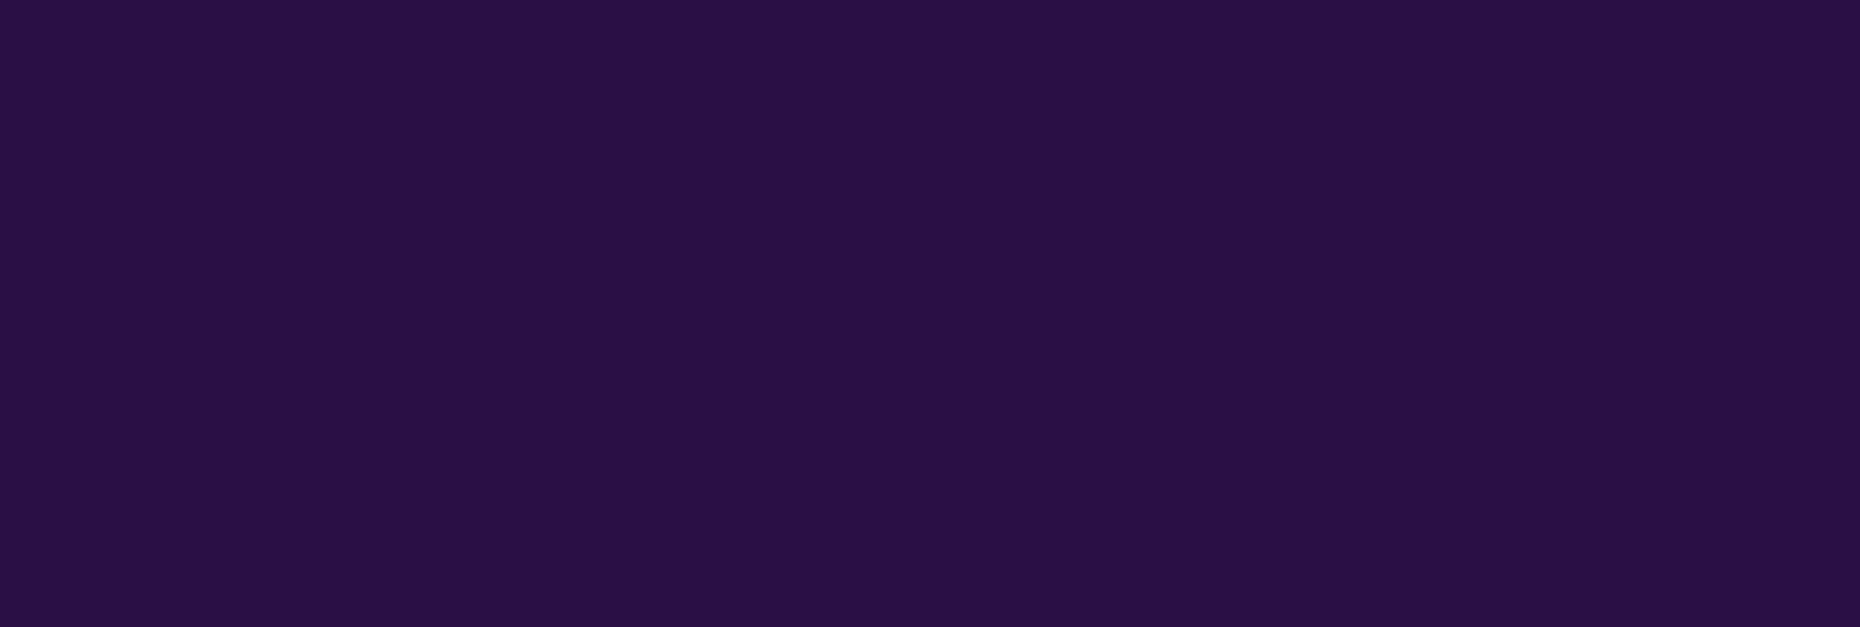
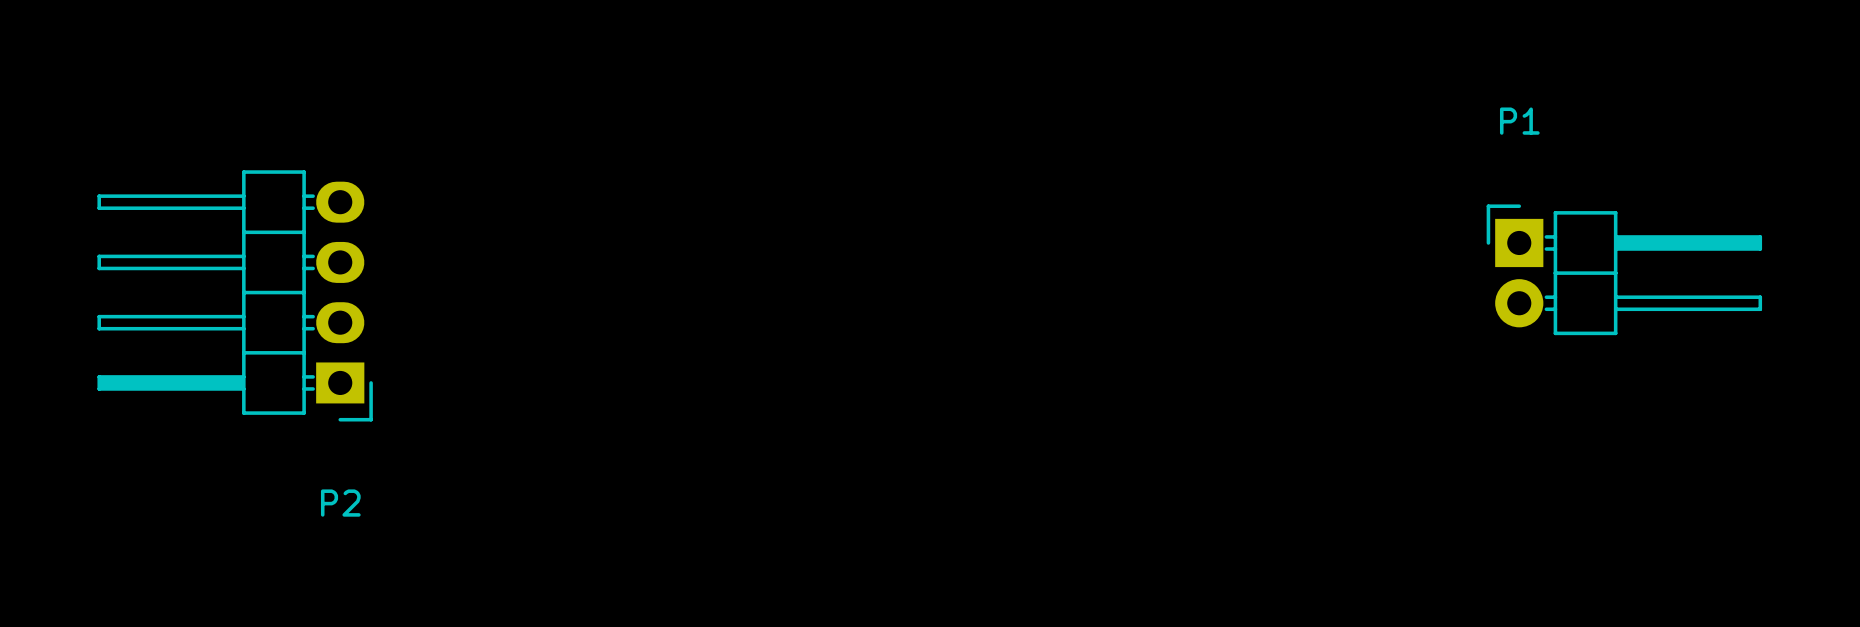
P1: none -> (1624, 269)
P2: none -> (235, 295)

